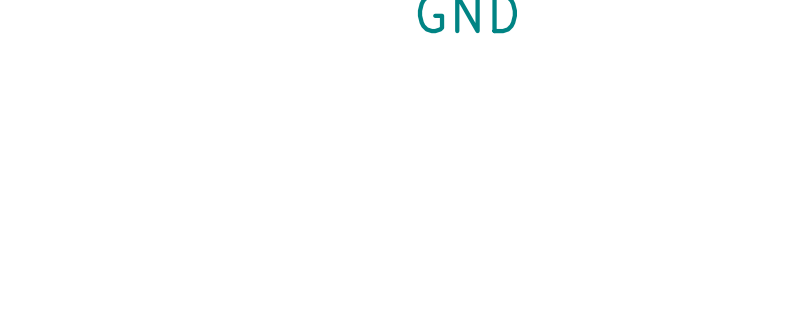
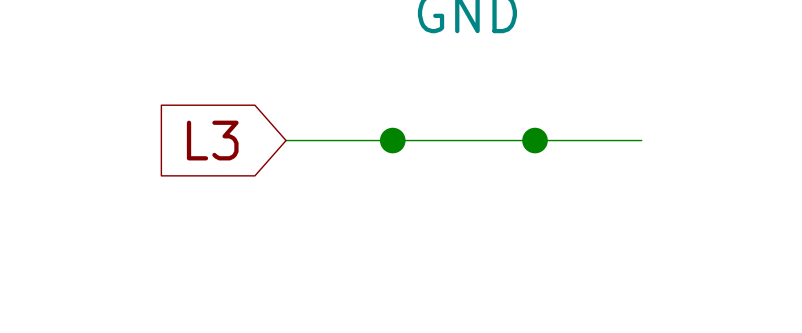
global label: none -> L3 (212, 140)
wire: none -> (286, 140) (641, 140)
junction: none -> (392, 140)
junction: none -> (535, 140)

